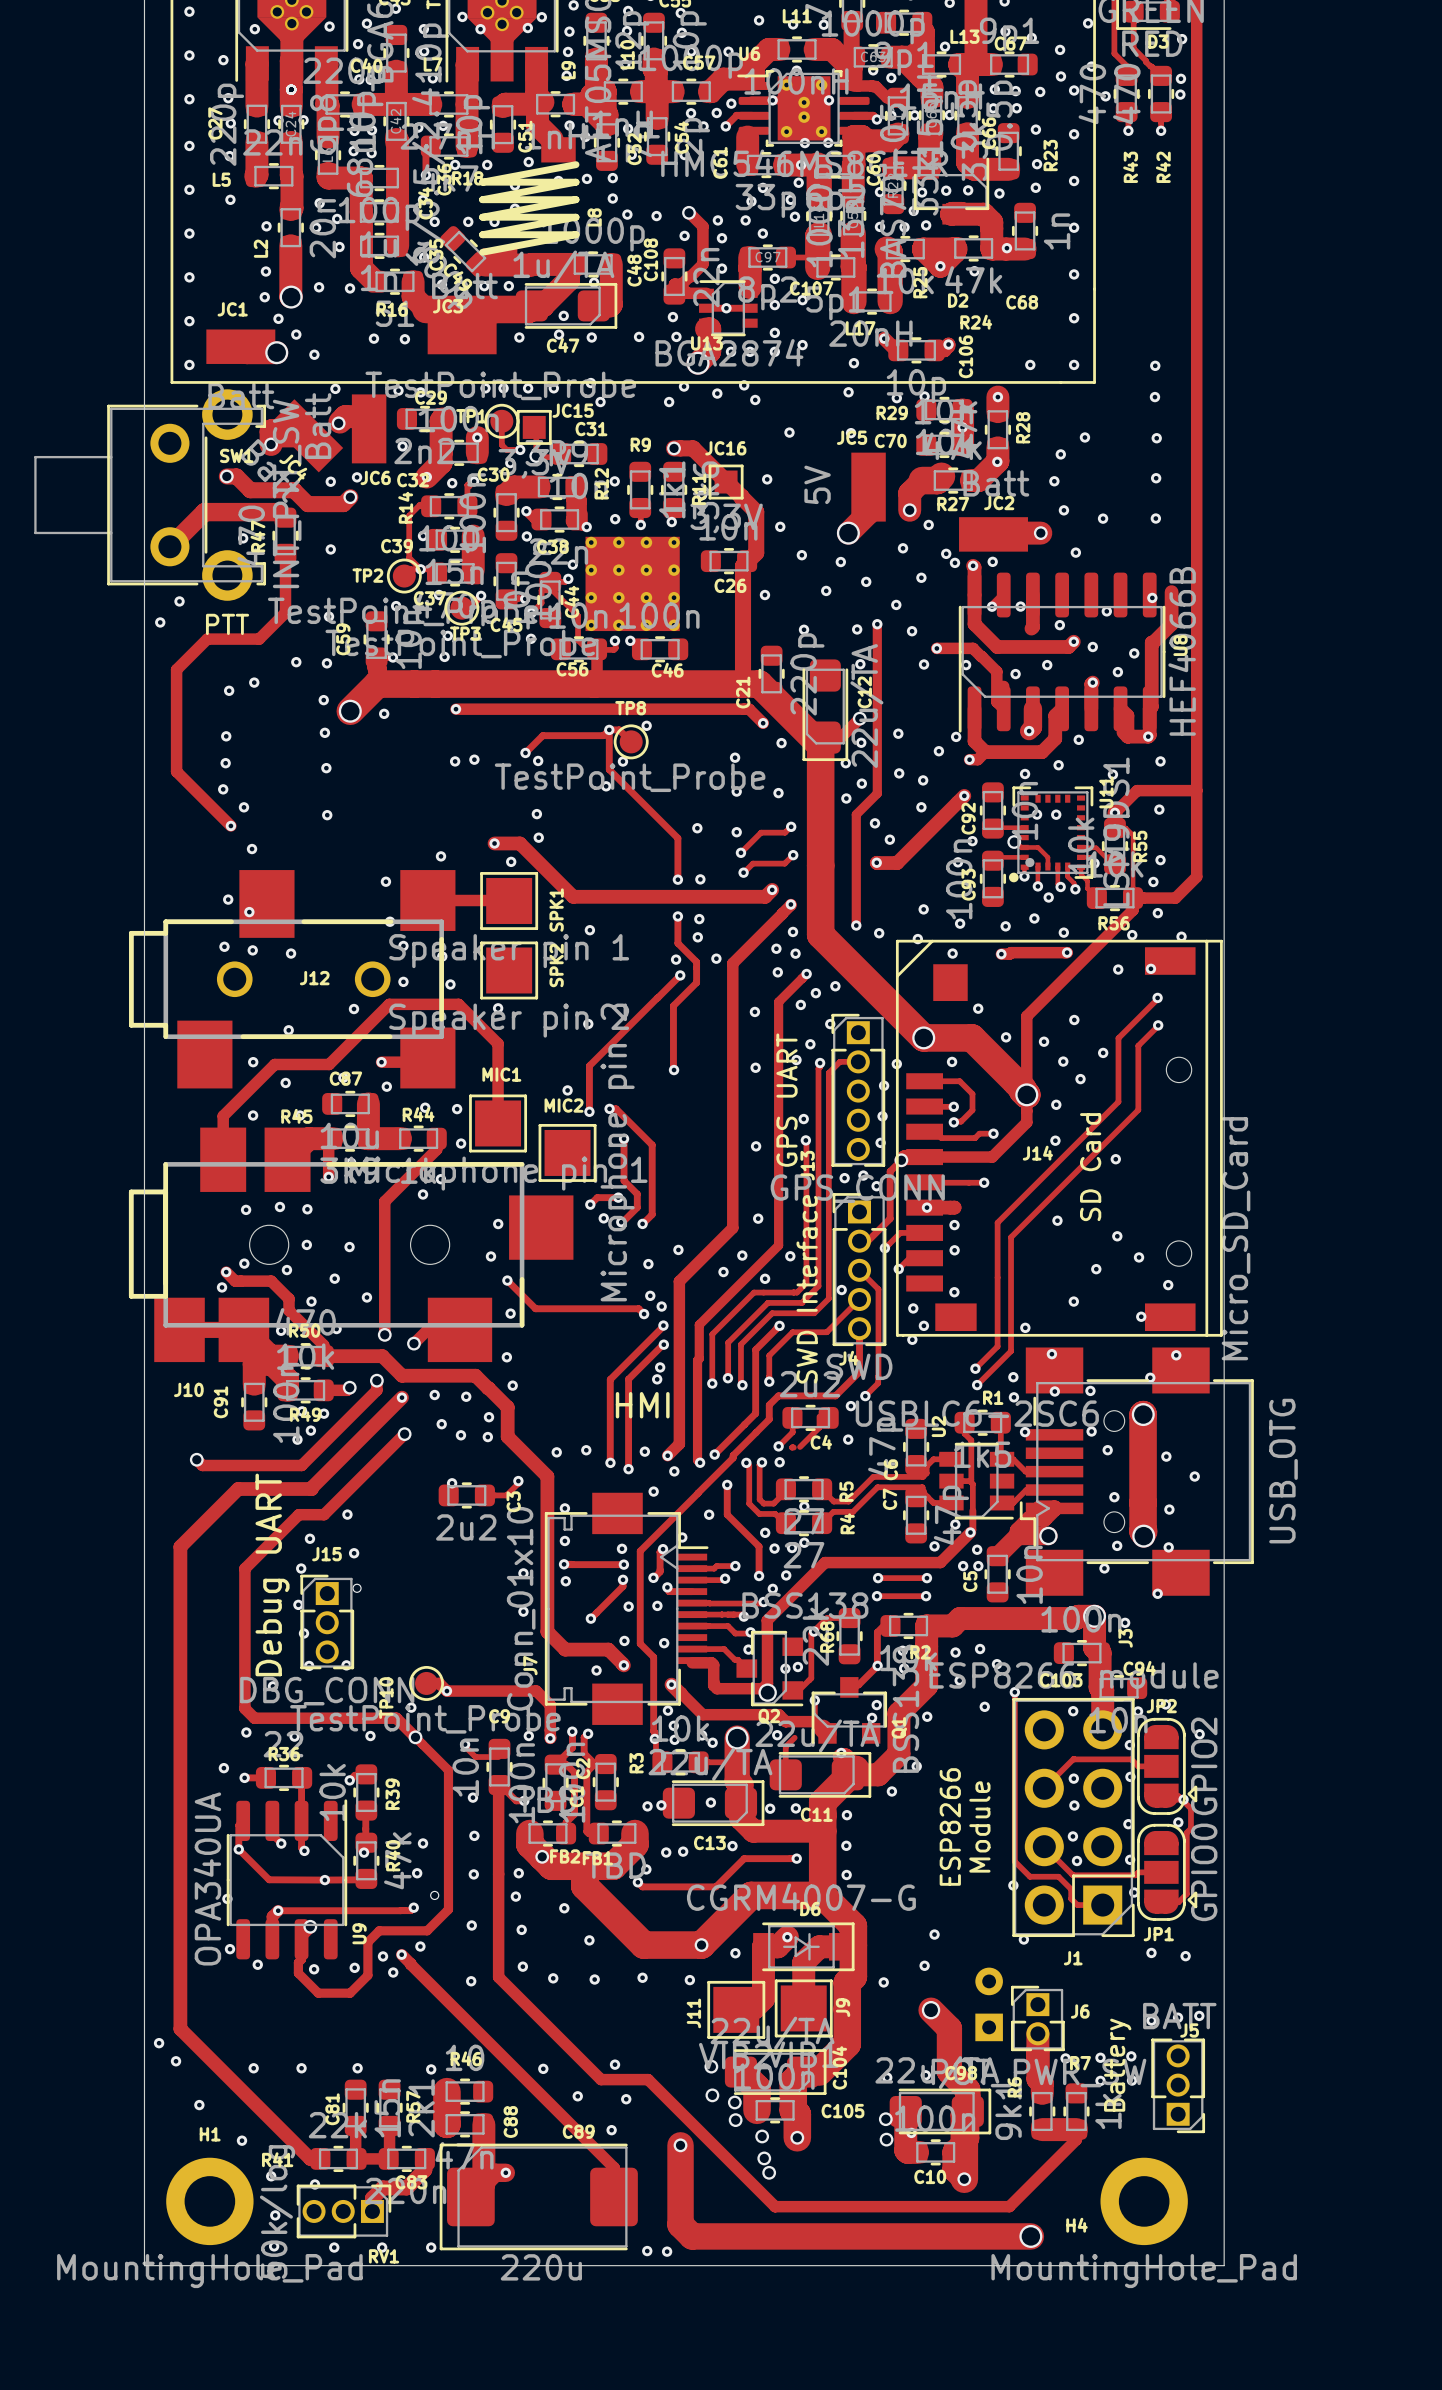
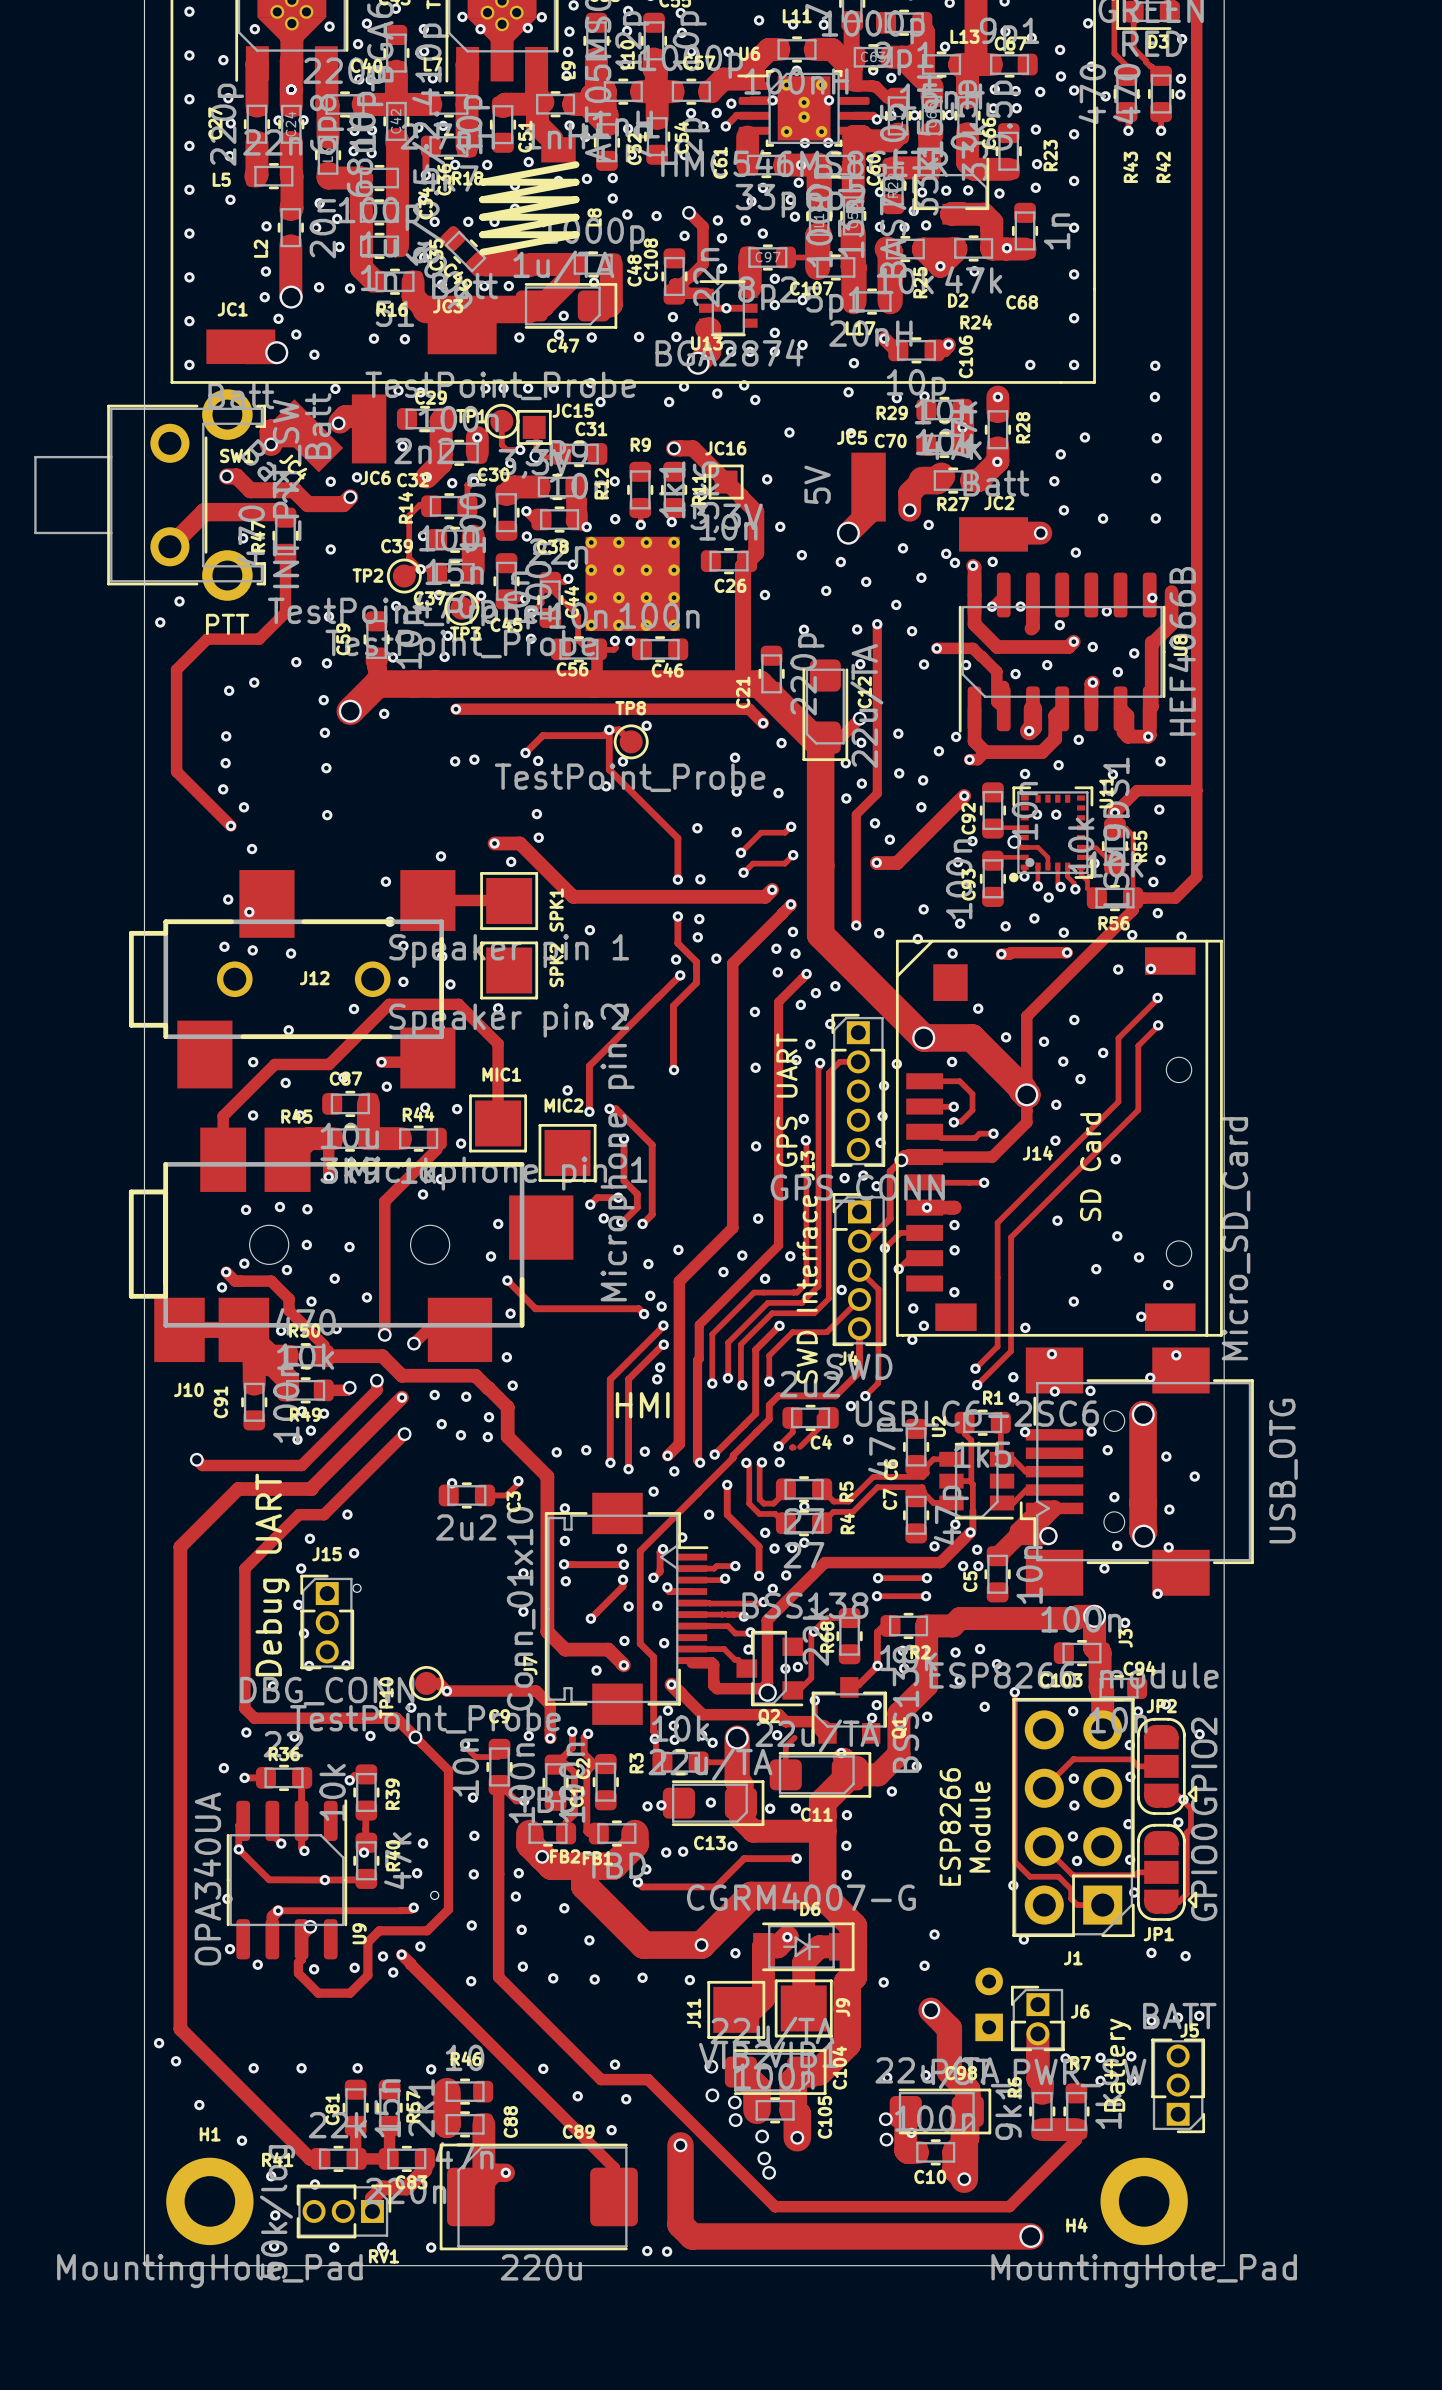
C105 name rotation: 0° (842, 2111) -> 90° counterclockwise (824, 2117)

